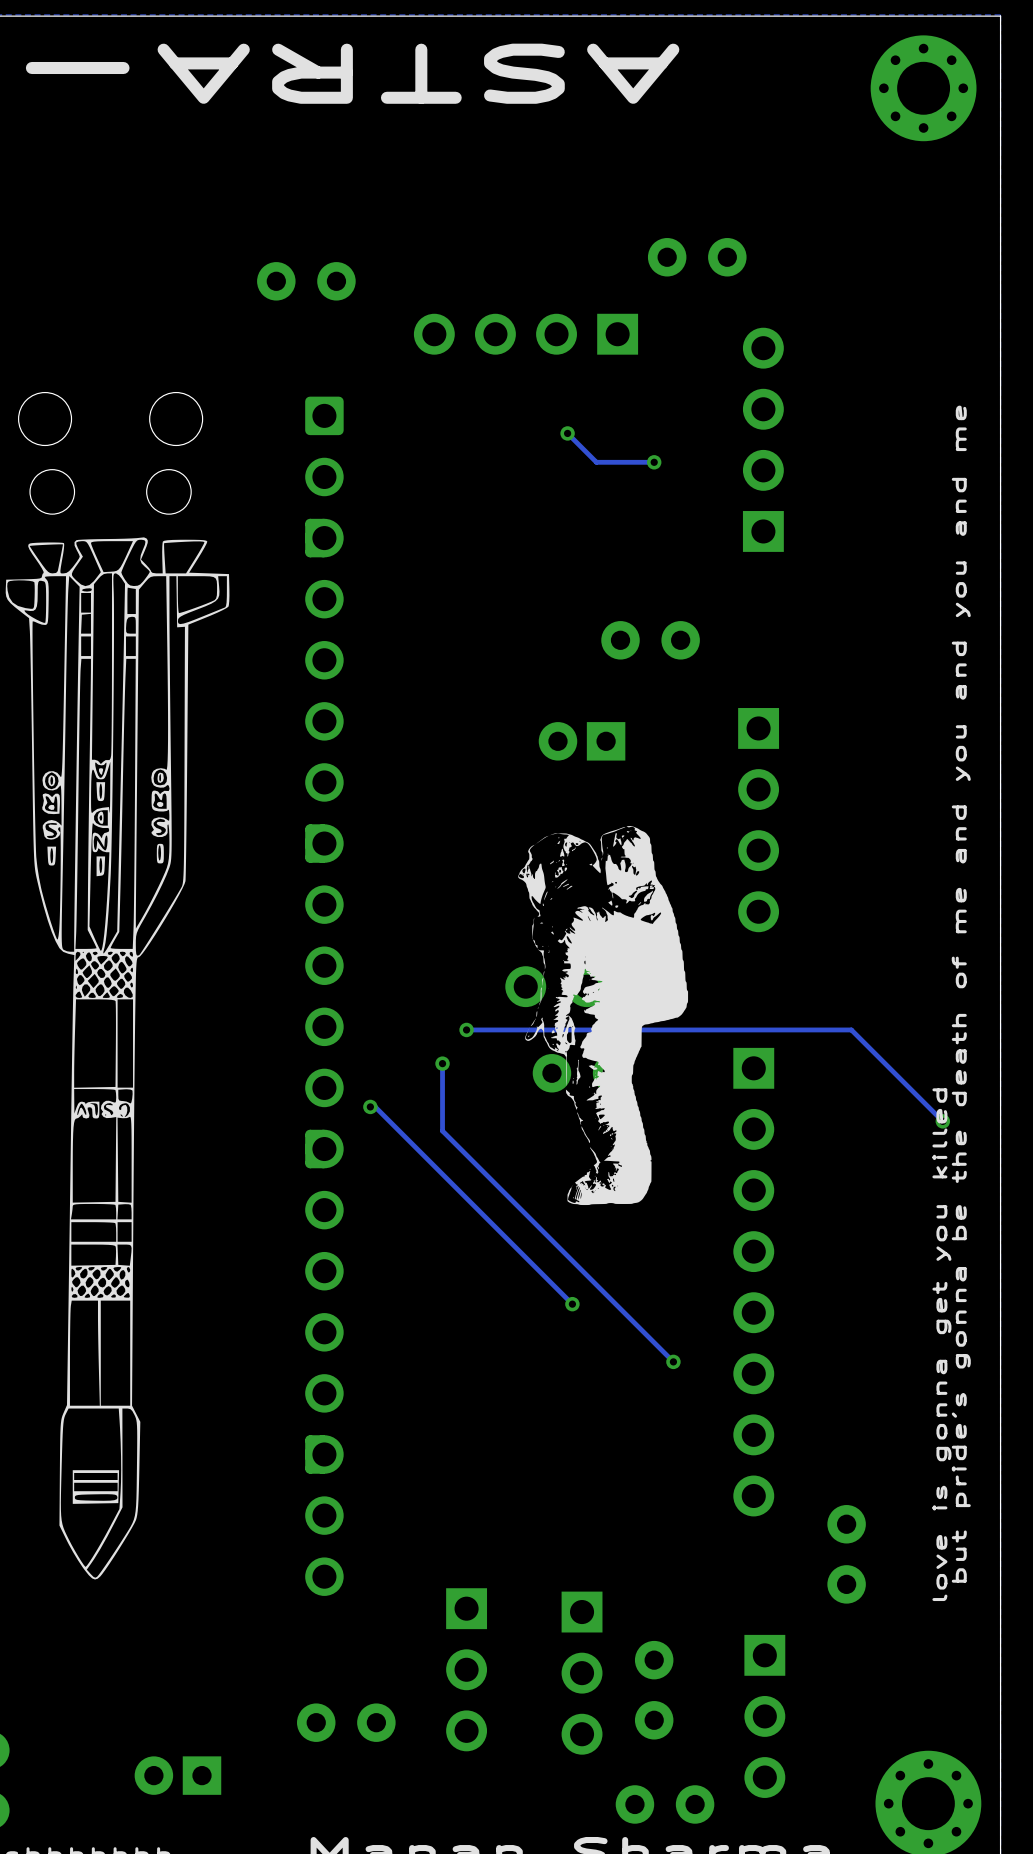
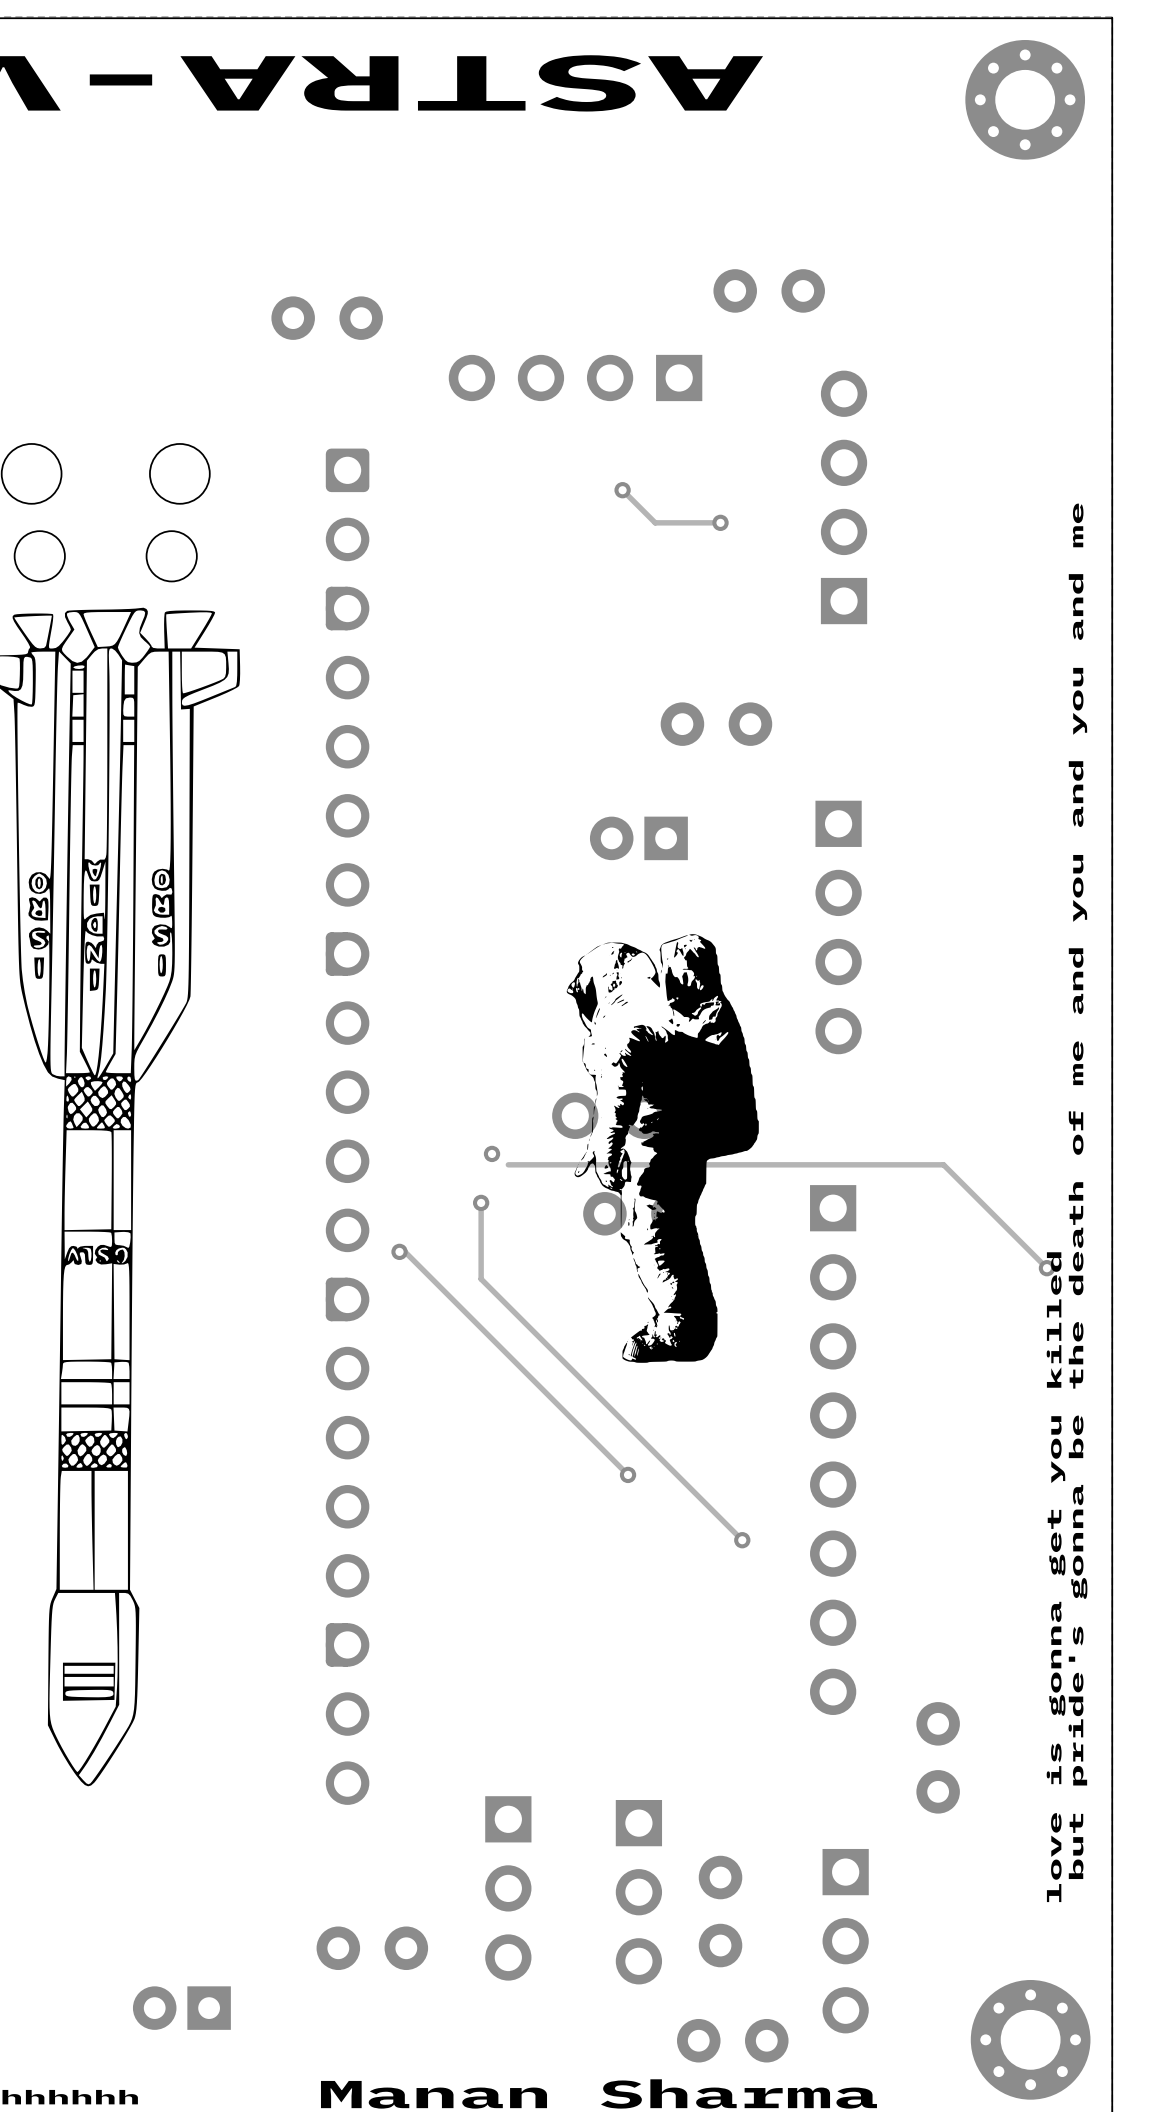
text position: but pride's gonna be the death of me and you and you and me (961, 994) -> but pride's gonna be the death of me and you and you and me (1077, 1191)
via position: (466, 1029) -> (492, 1153)
text position: love is gonna get you killed (941, 1344) -> love is gonna get you killed (1056, 1577)

